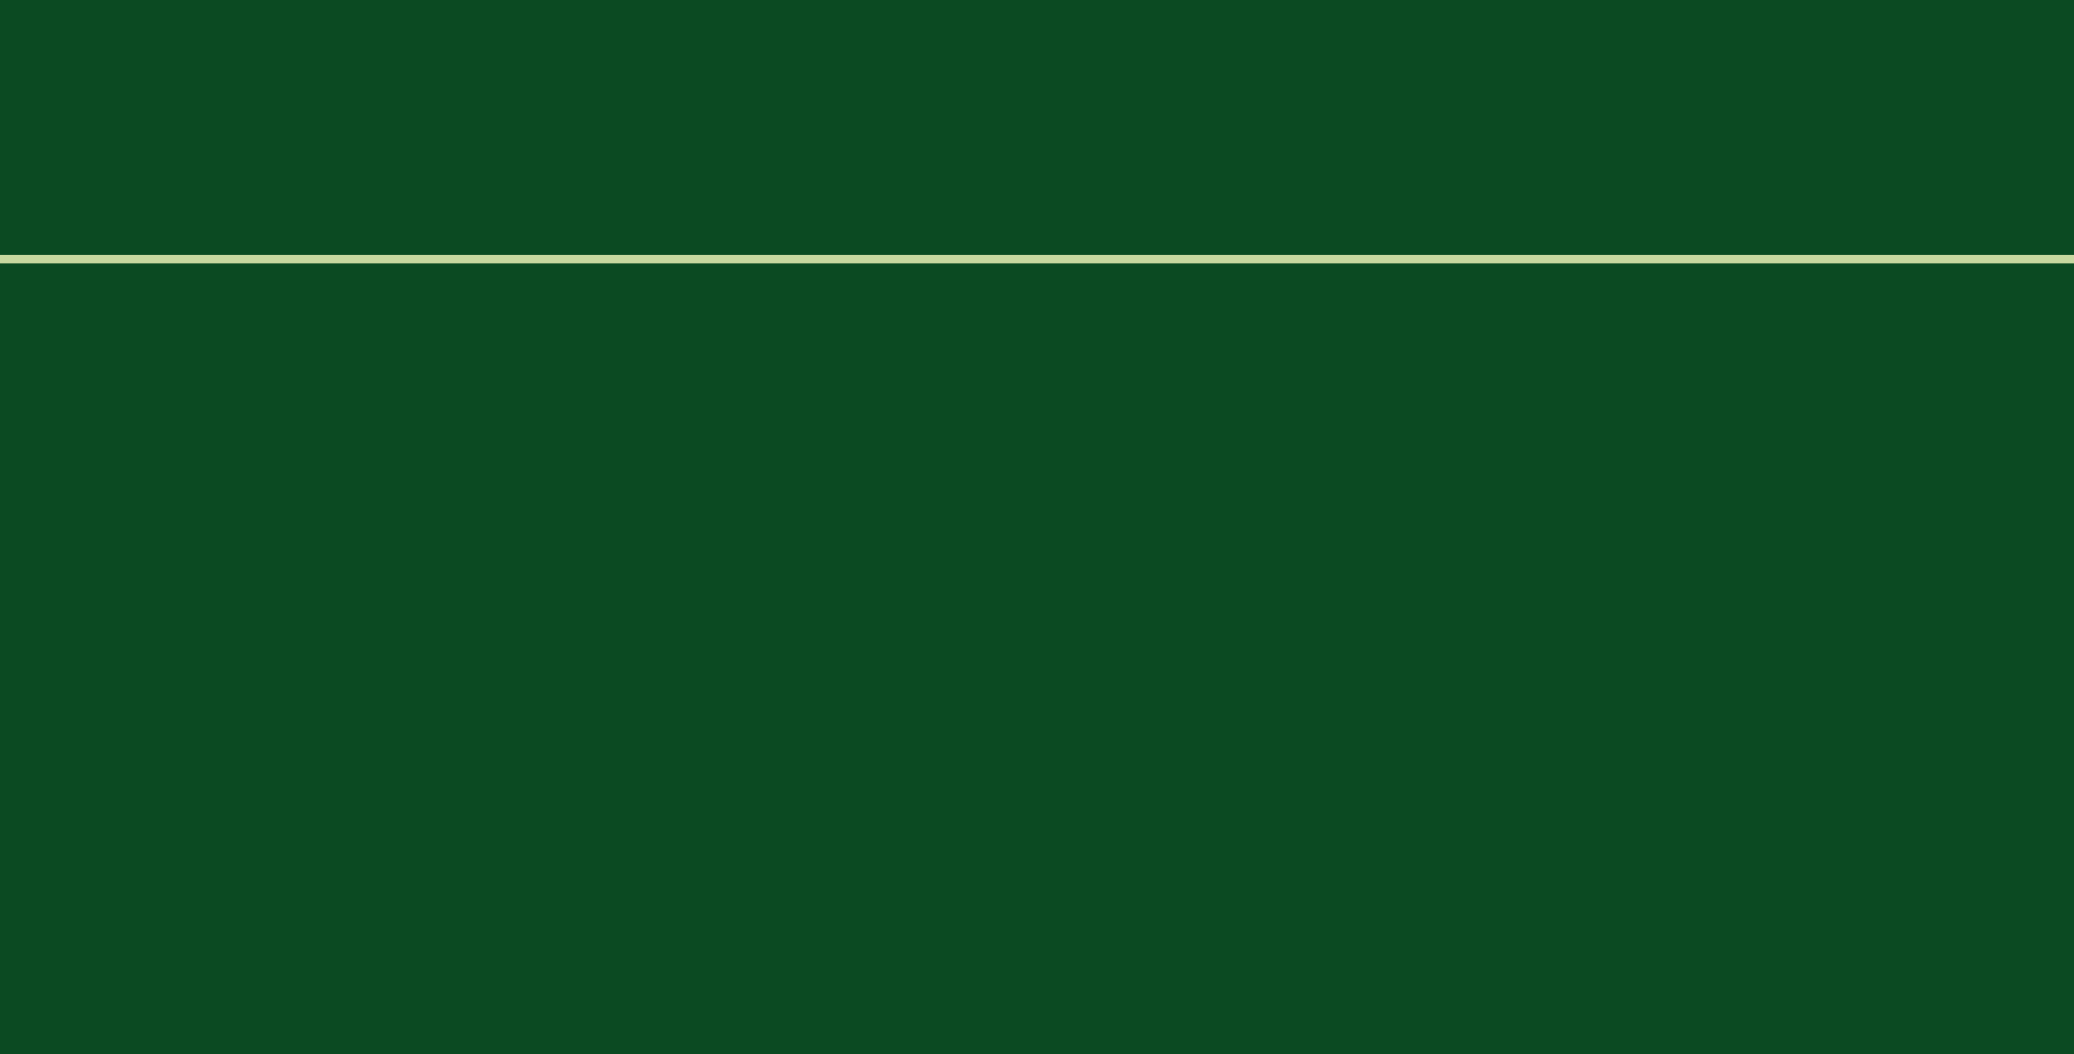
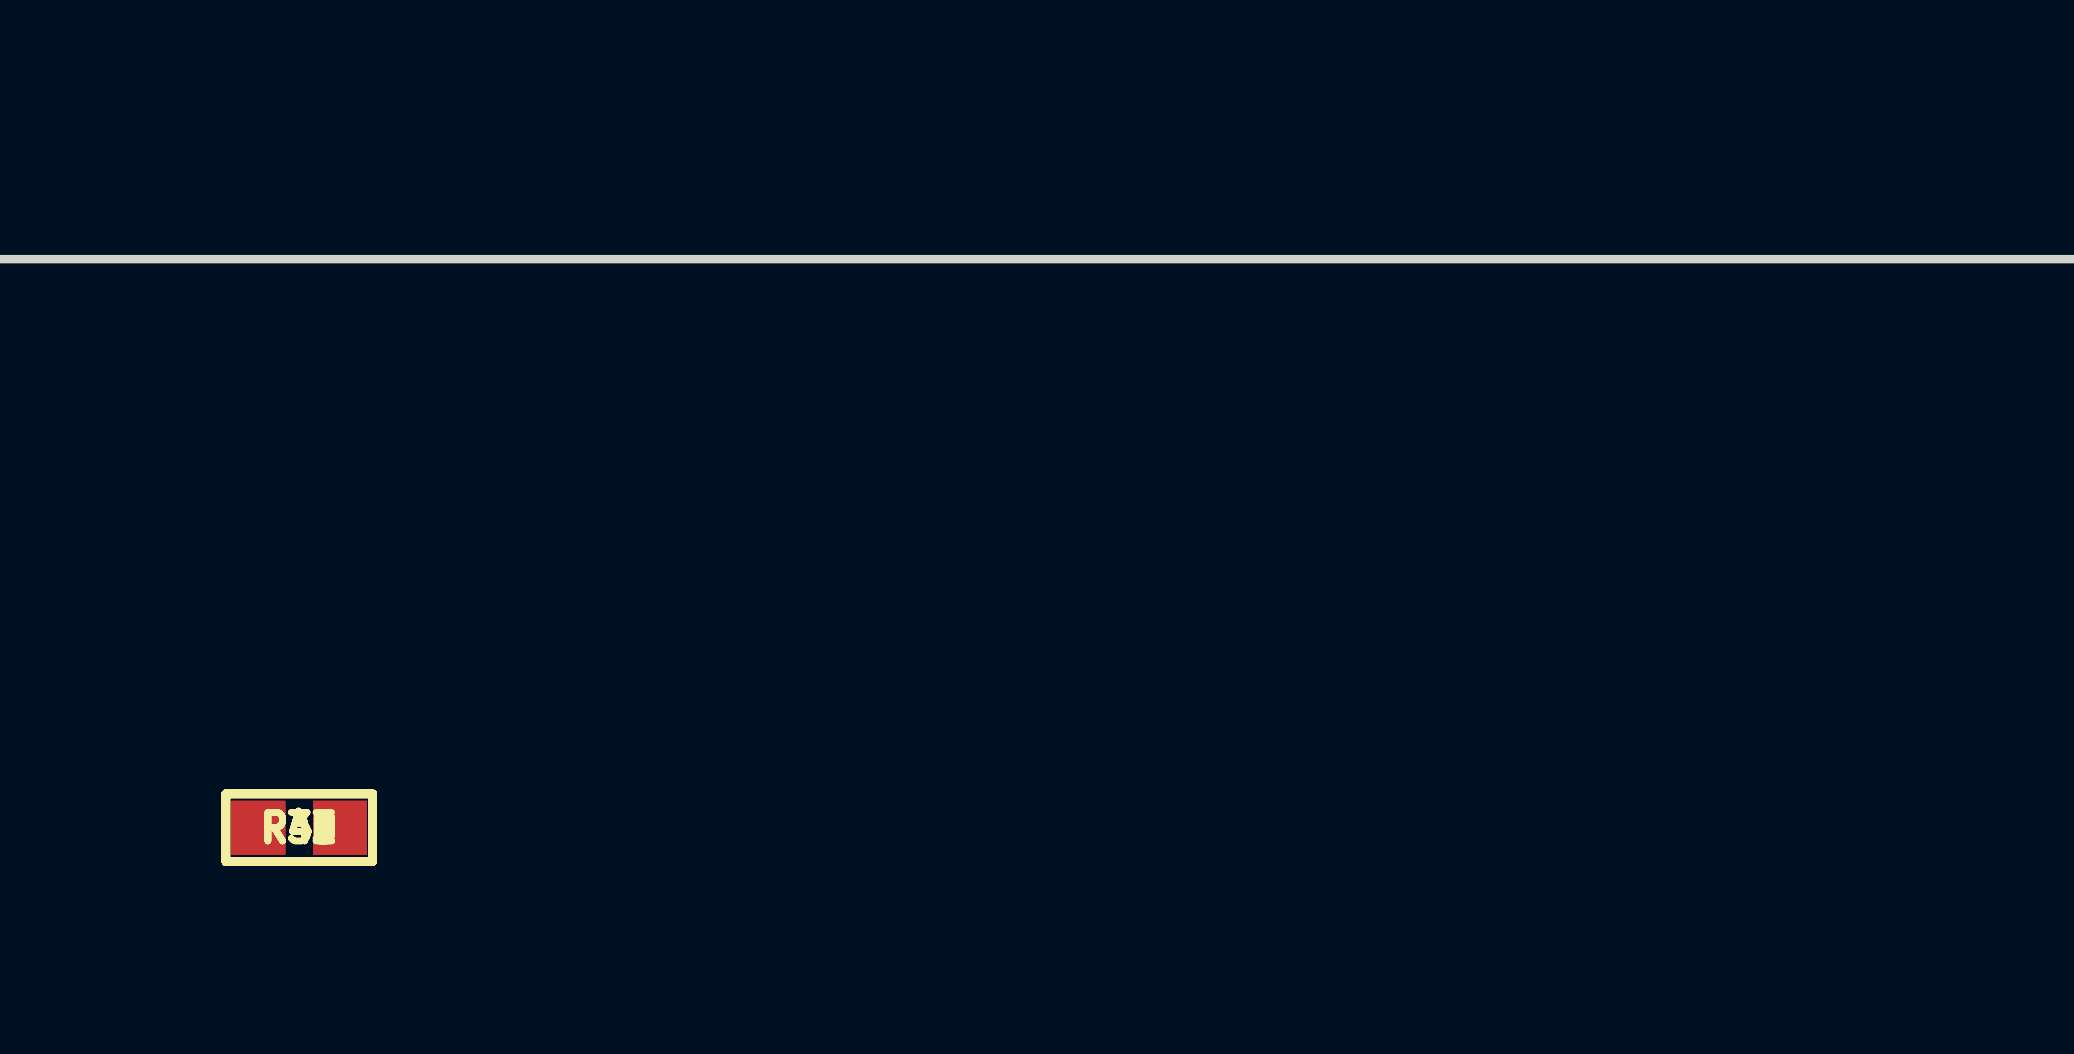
part: none -> (299, 827)
part: none -> (299, 827)
part: none -> (299, 827)
part: none -> (299, 827)
part: none -> (299, 827)
part: none -> (299, 827)

